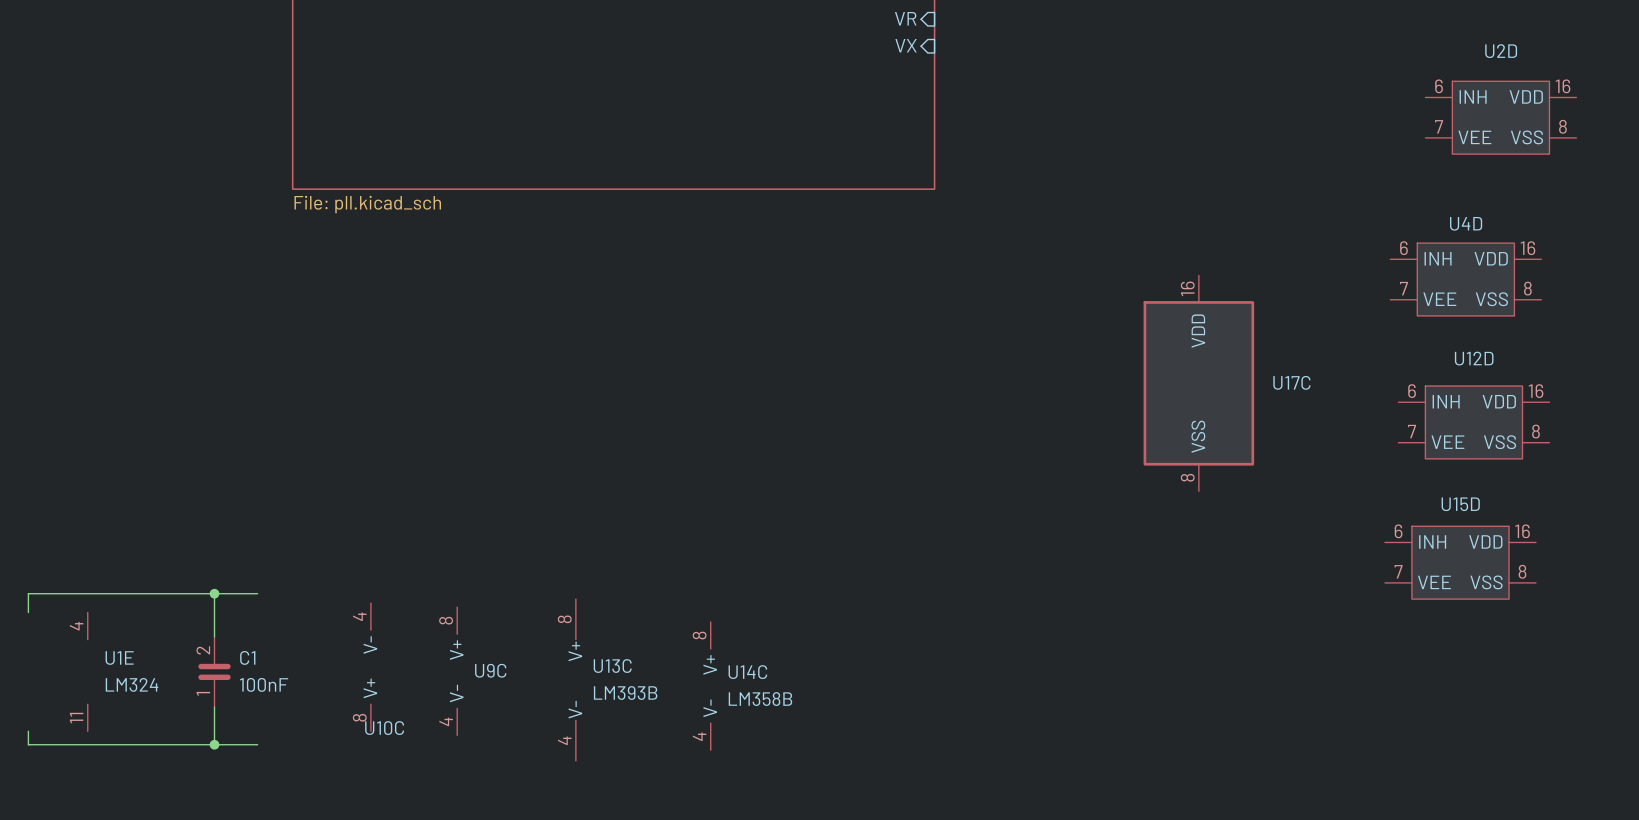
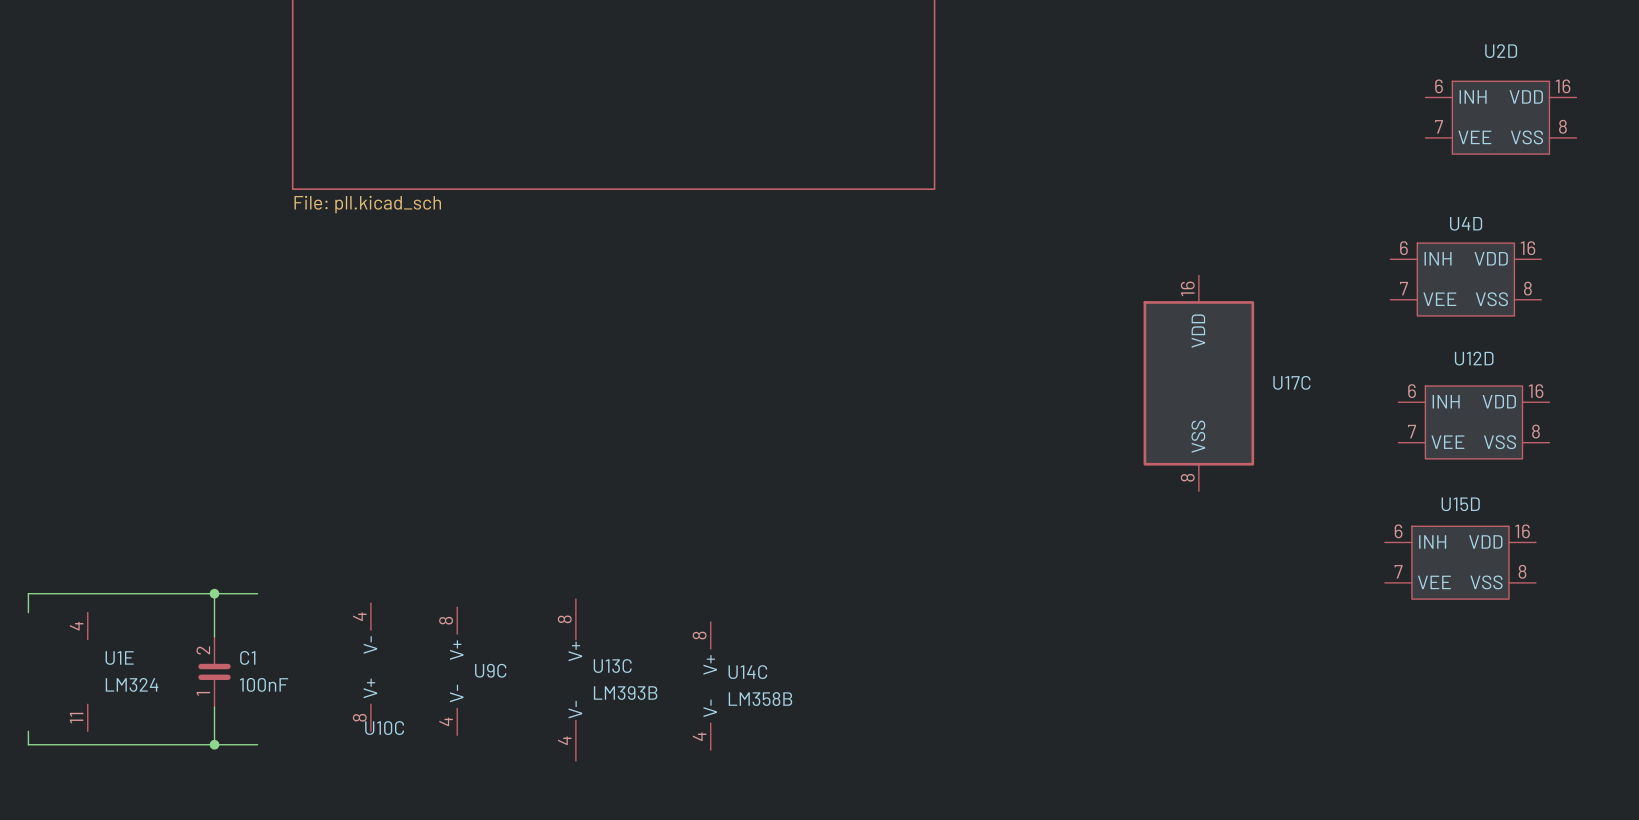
sheet pin: VR (905, 18) -> none
sheet pin: VX (906, 45) -> none

